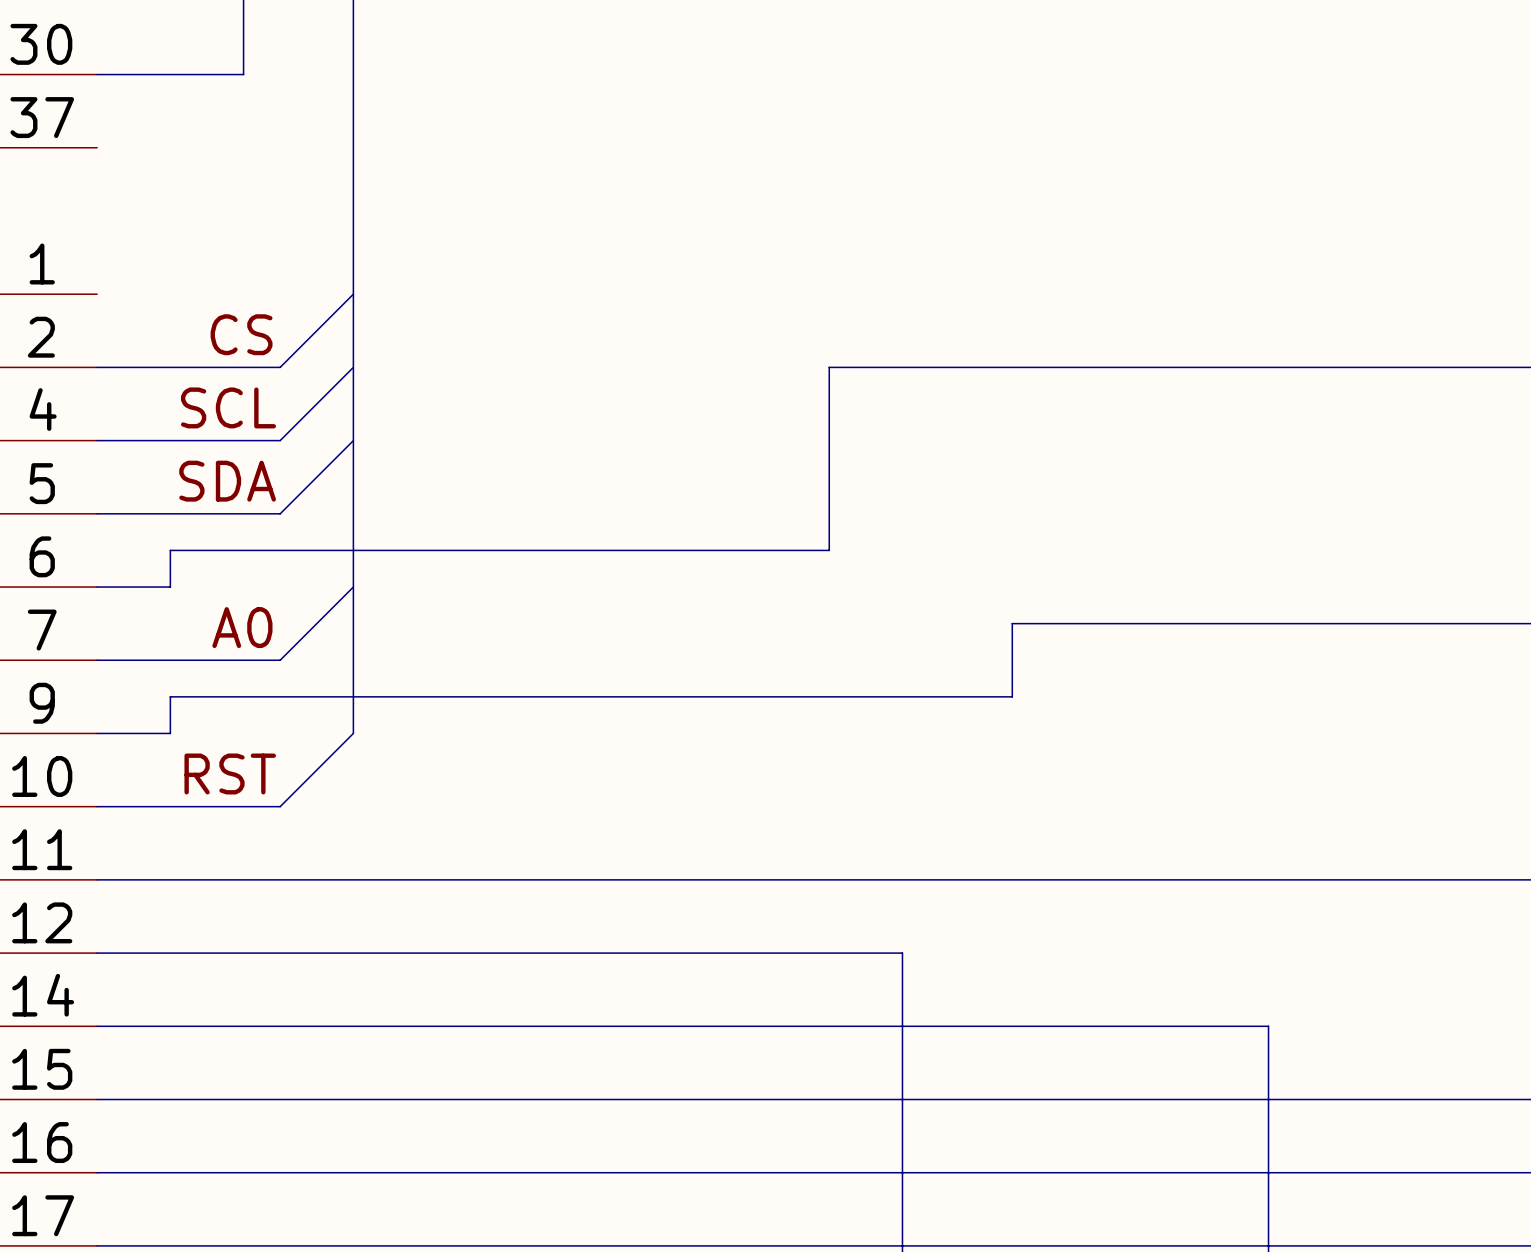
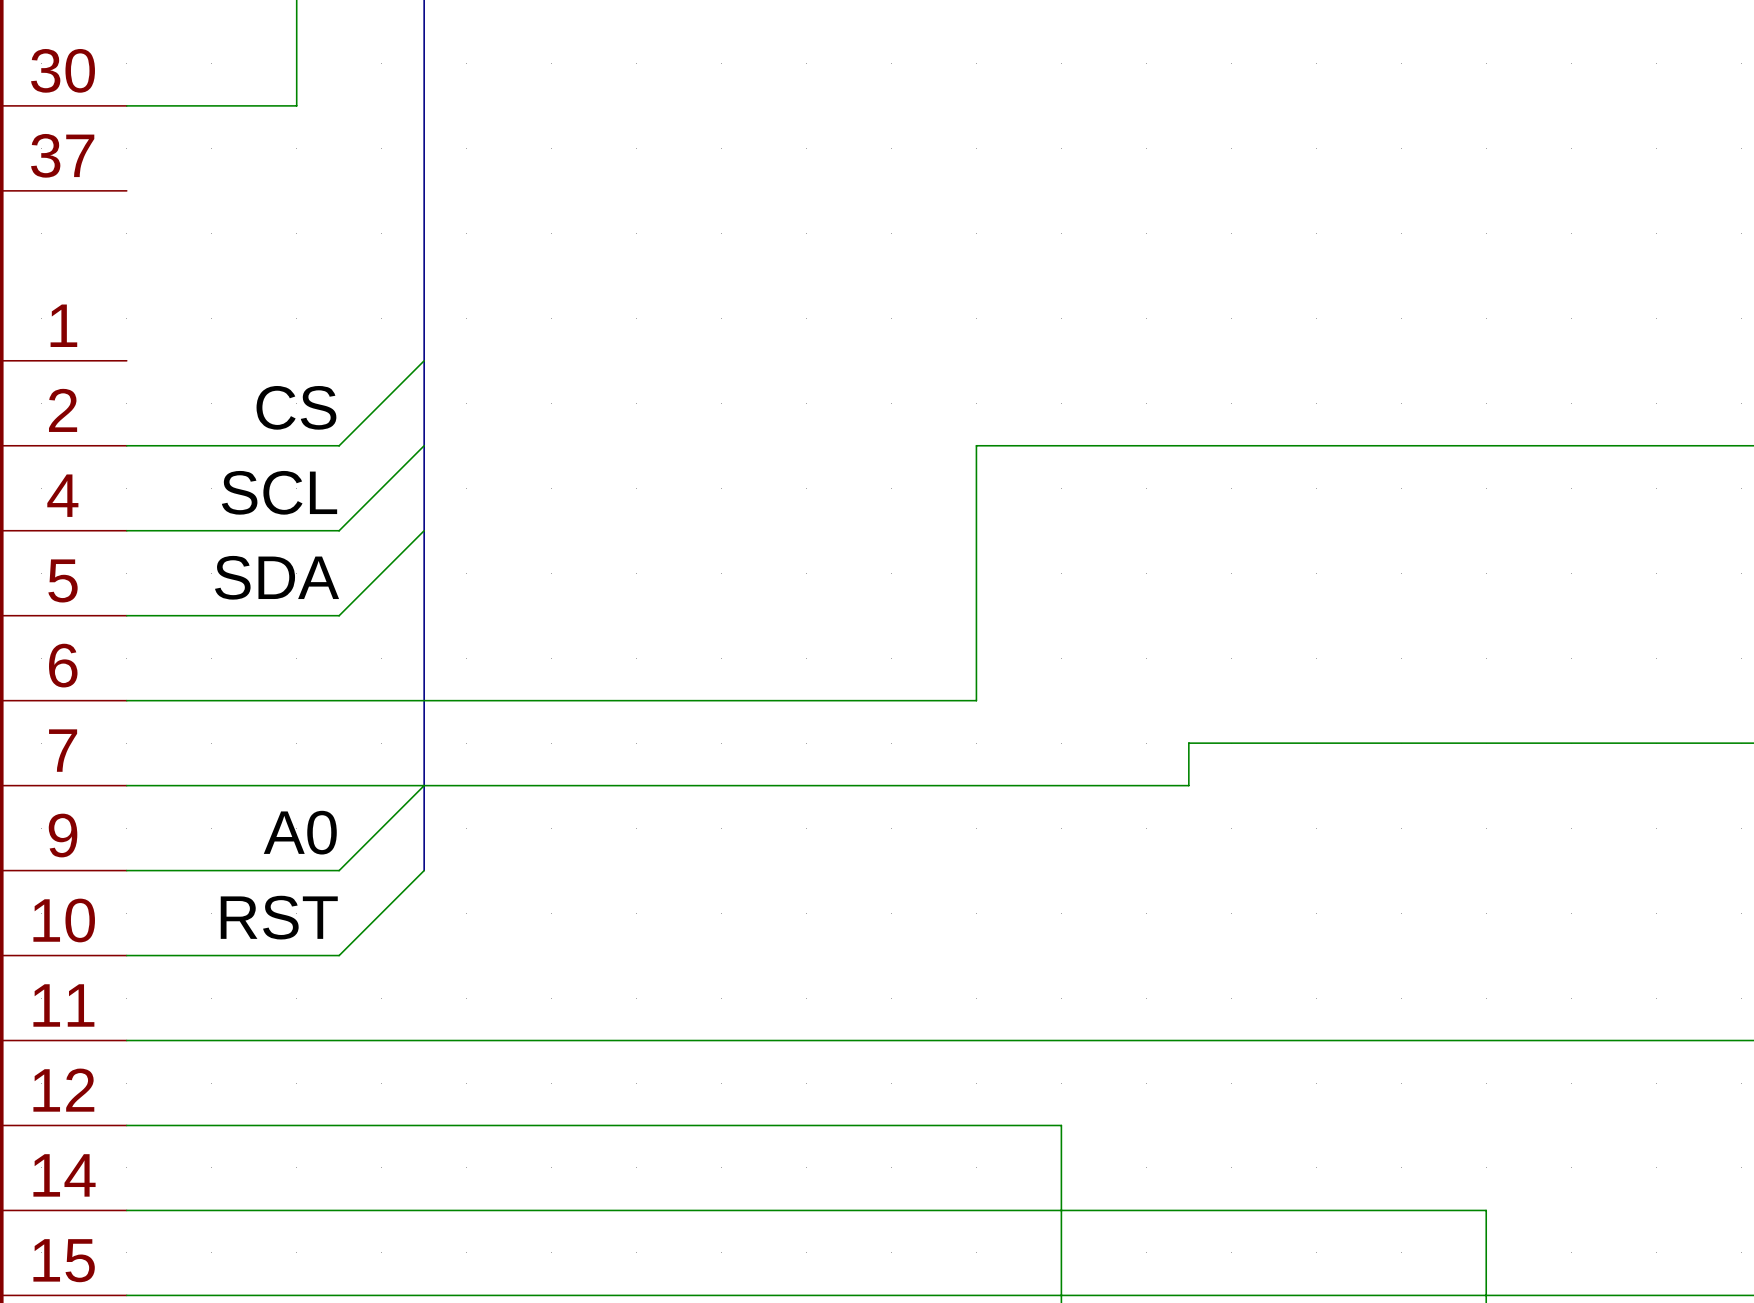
wire: (829, 550) (170, 550) (170, 587) -> (976, 658) (976, 700) (211, 700)
wire: (353, 587) (280, 660) -> none
label position: A0 (242, 627) -> A0 (300, 832)
wire: none -> (424, 785) (339, 870) (211, 870)
wire: (1012, 660) (1012, 696) (170, 696) (170, 733) -> (1188, 785) (339, 785)

